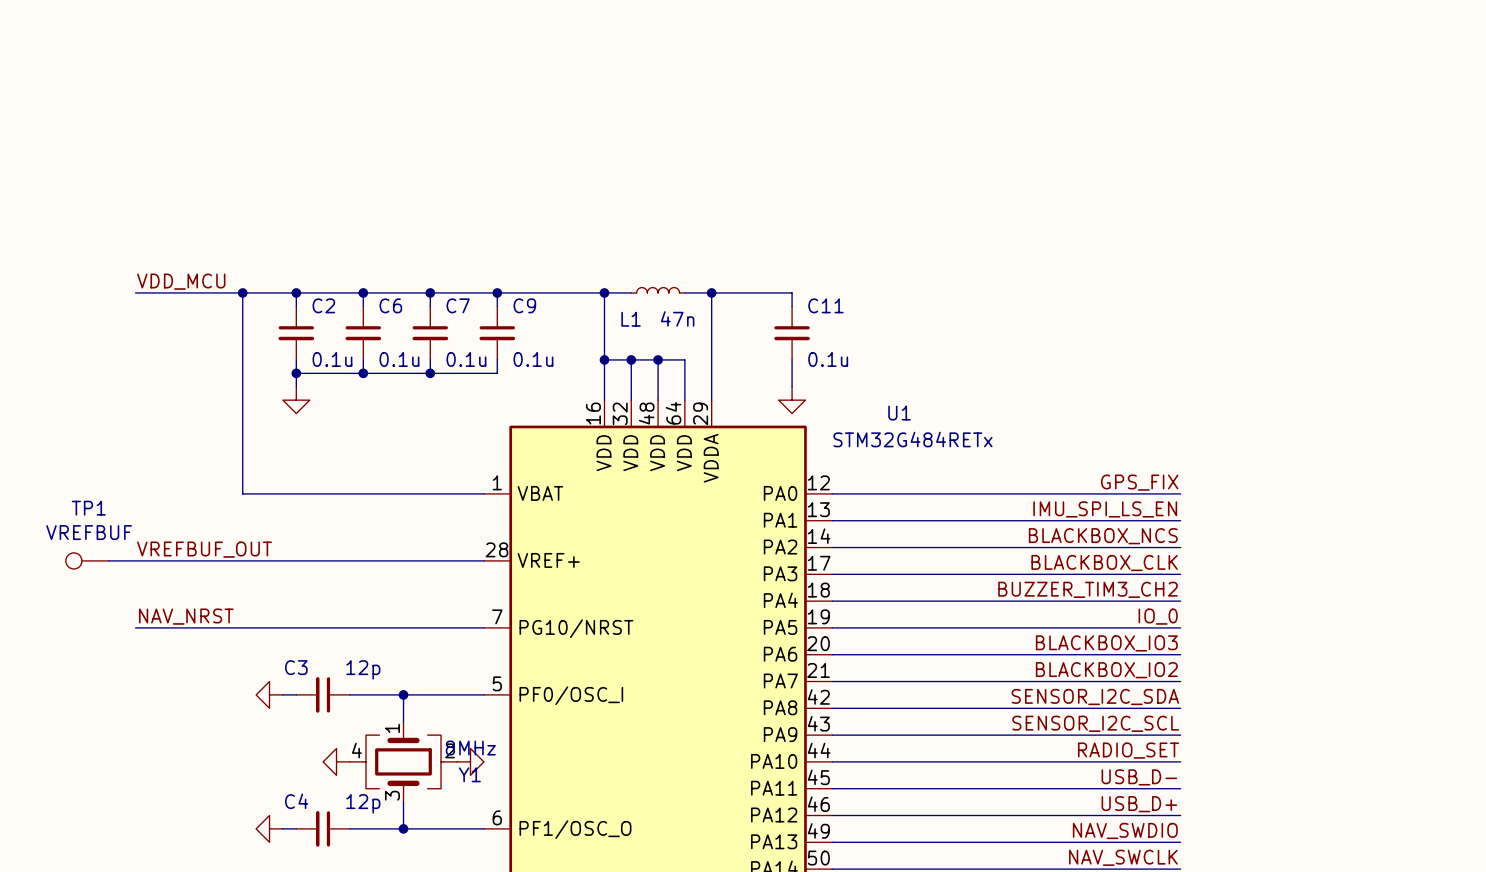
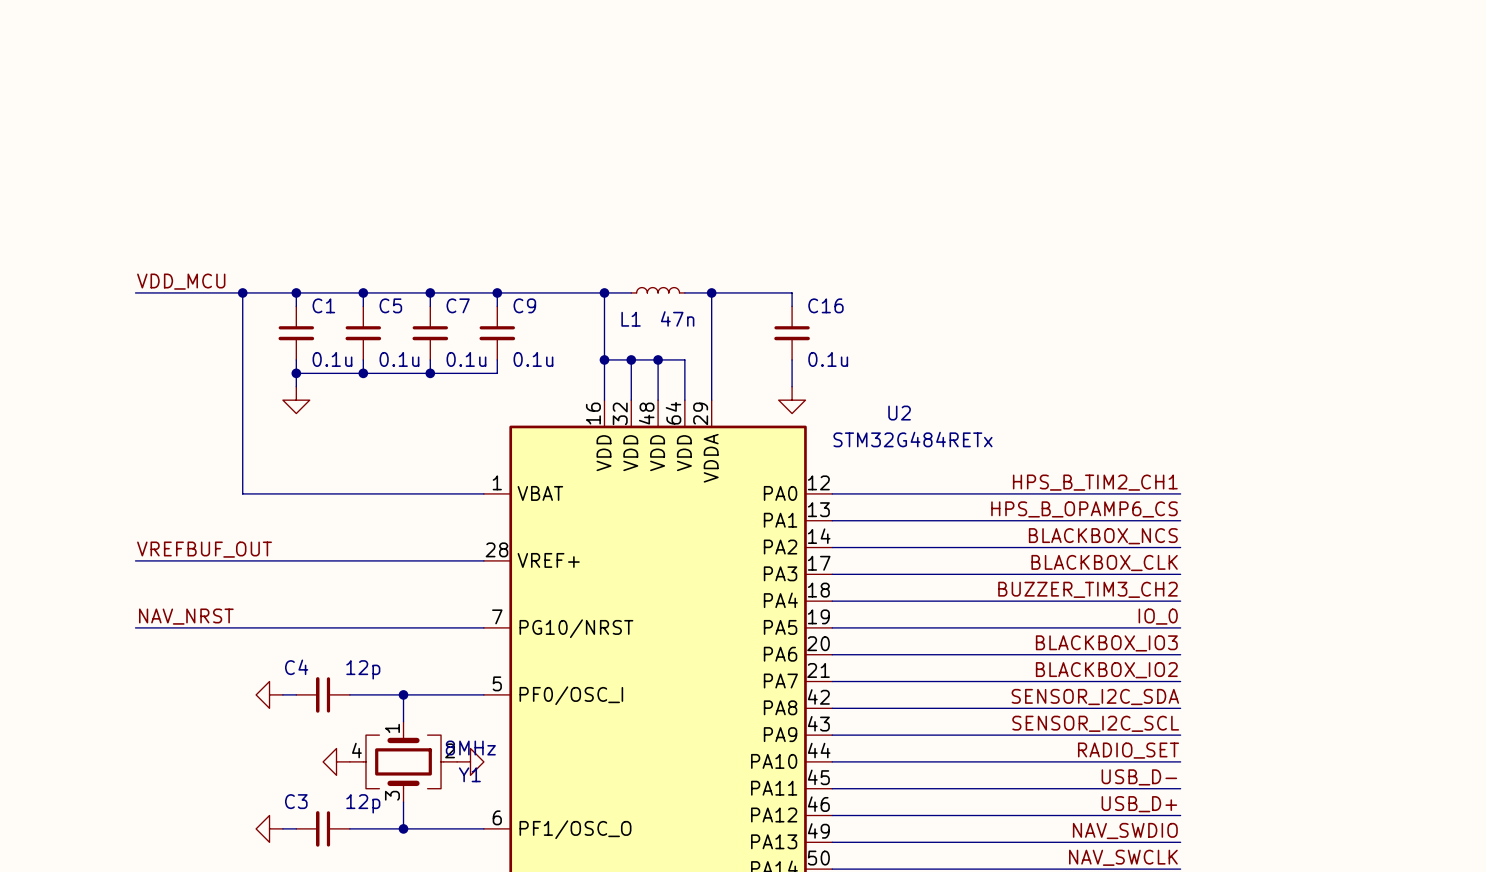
C2 name: C2 (323, 305) -> C1 (323, 305)
C6 name: C6 (390, 305) -> C5 (390, 305)
C11 name: C11 (825, 305) -> C16 (825, 305)
U1 name: U1 (899, 413) -> U2 (899, 413)
label: GPS_FIX (1139, 482) -> HPS_B_TIM2_CH1 (1095, 482)
label: IMU_SPI_LS_EN (1105, 509) -> HPS_B_OPAMP6_CS (1084, 509)
TP1: VREFBUF (87, 560) -> none
wire: (108, 560) (135, 560) -> none
C3 name: C3 (296, 667) -> C4 (296, 667)
C4 name: C4 (296, 801) -> C3 (296, 801)

